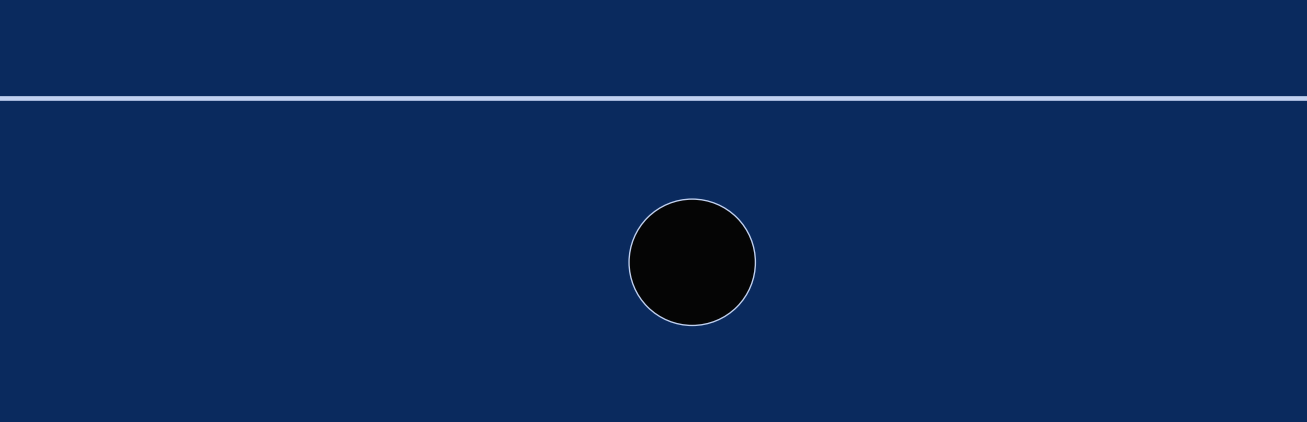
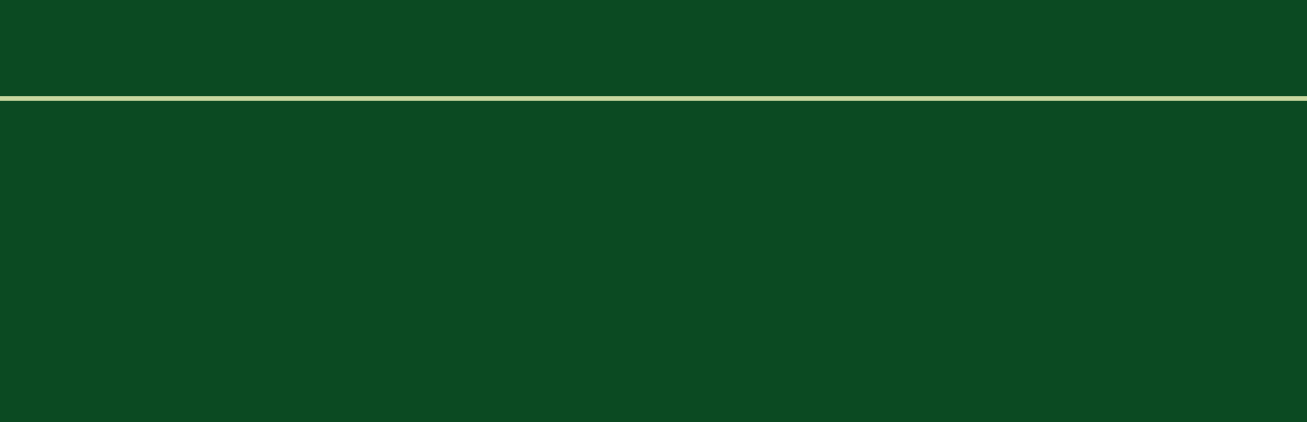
part: (692, 262) -> none

